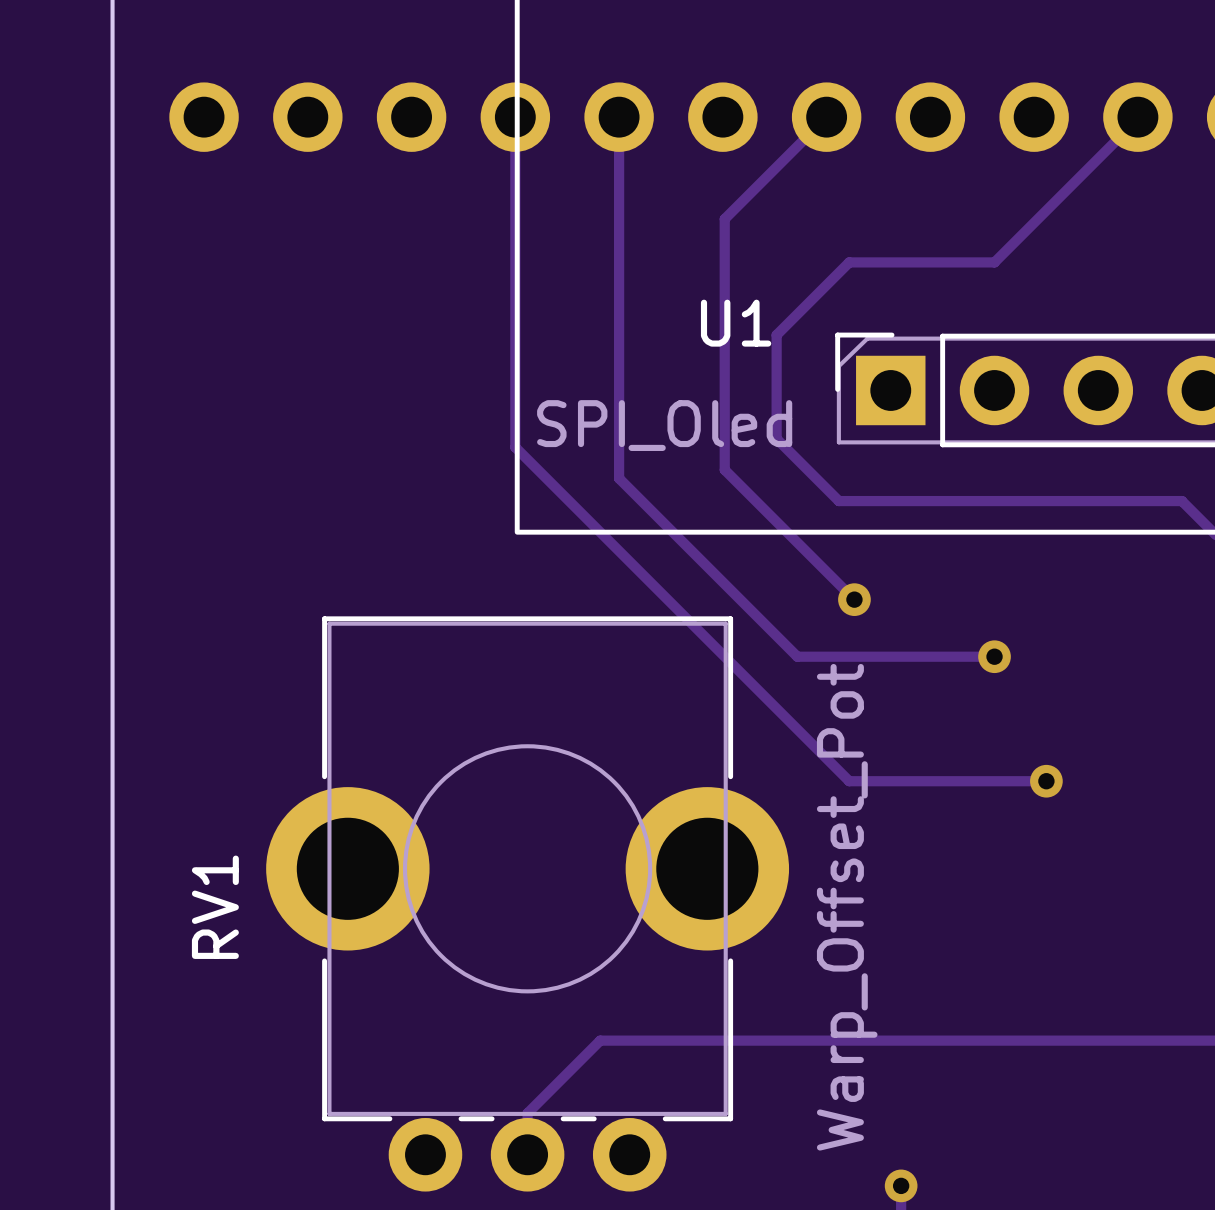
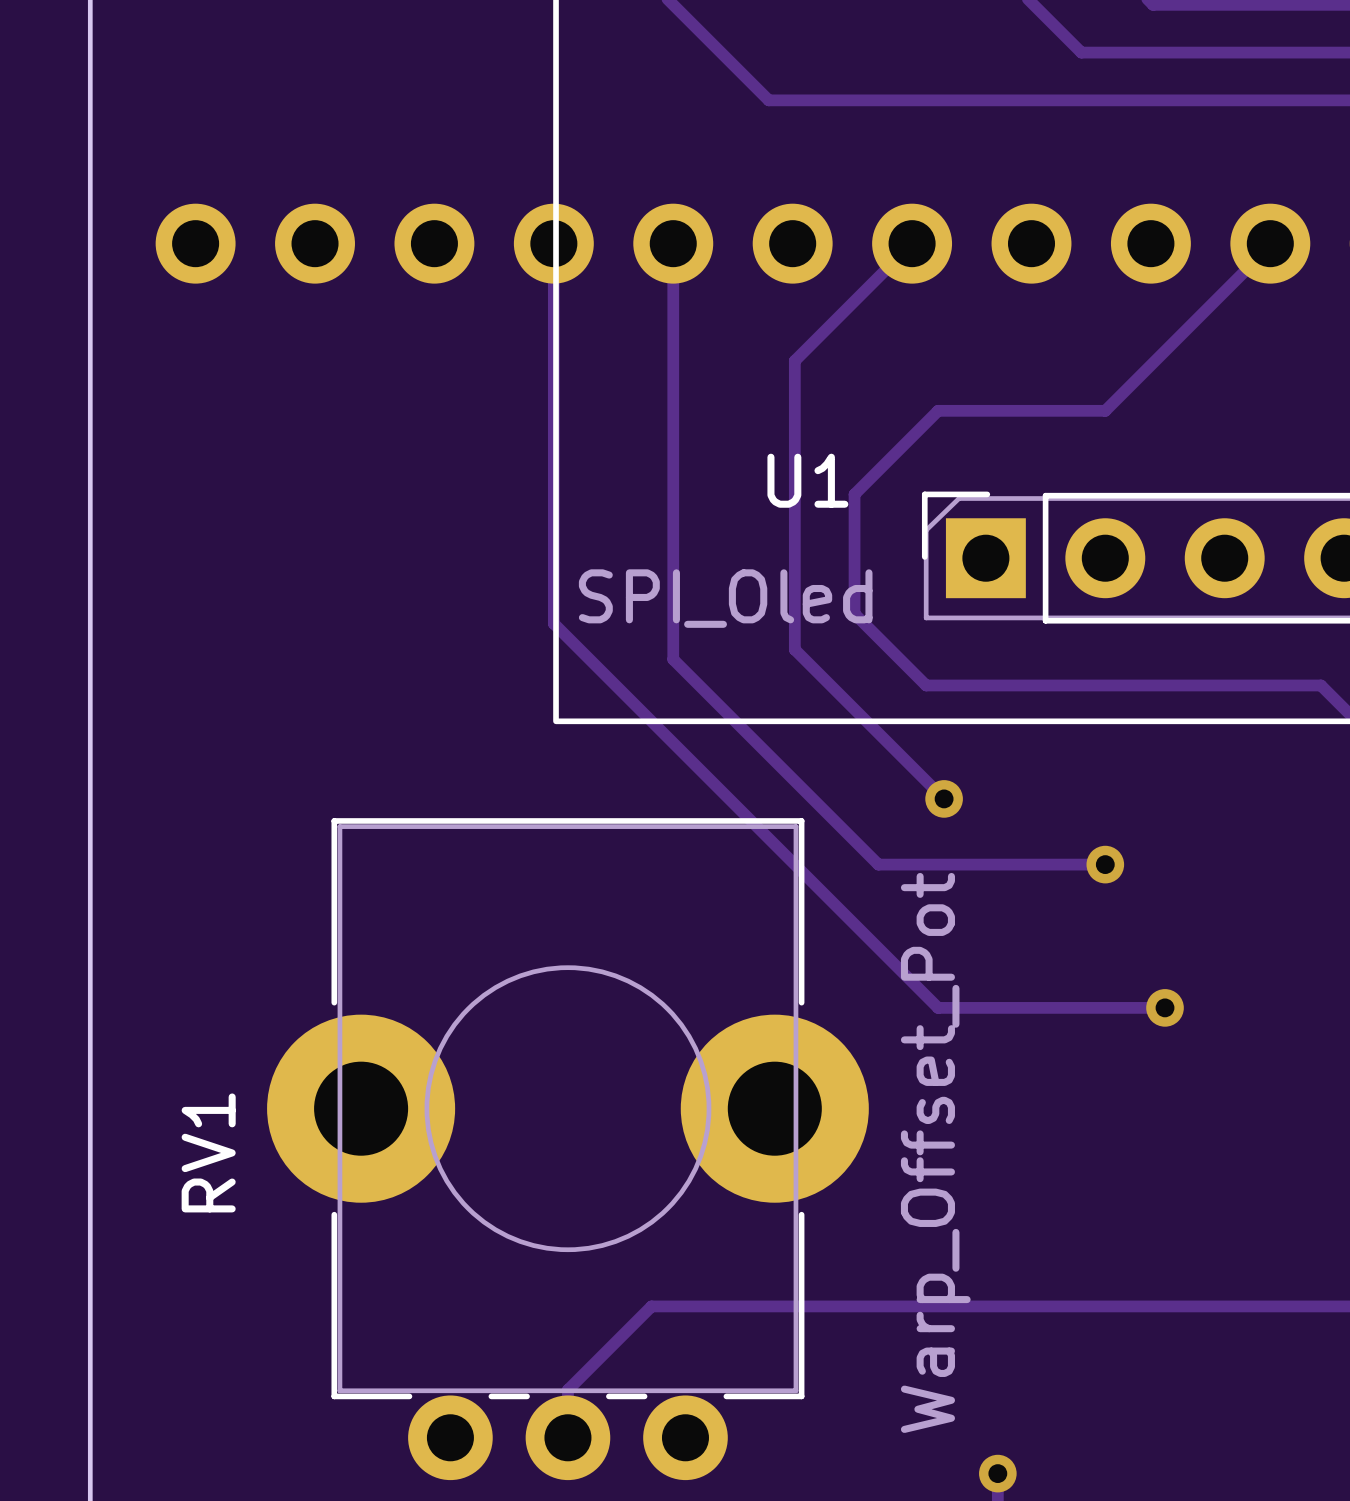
RV1 footprint: [266, 616, 790, 1192] -> [267, 818, 869, 1481]

